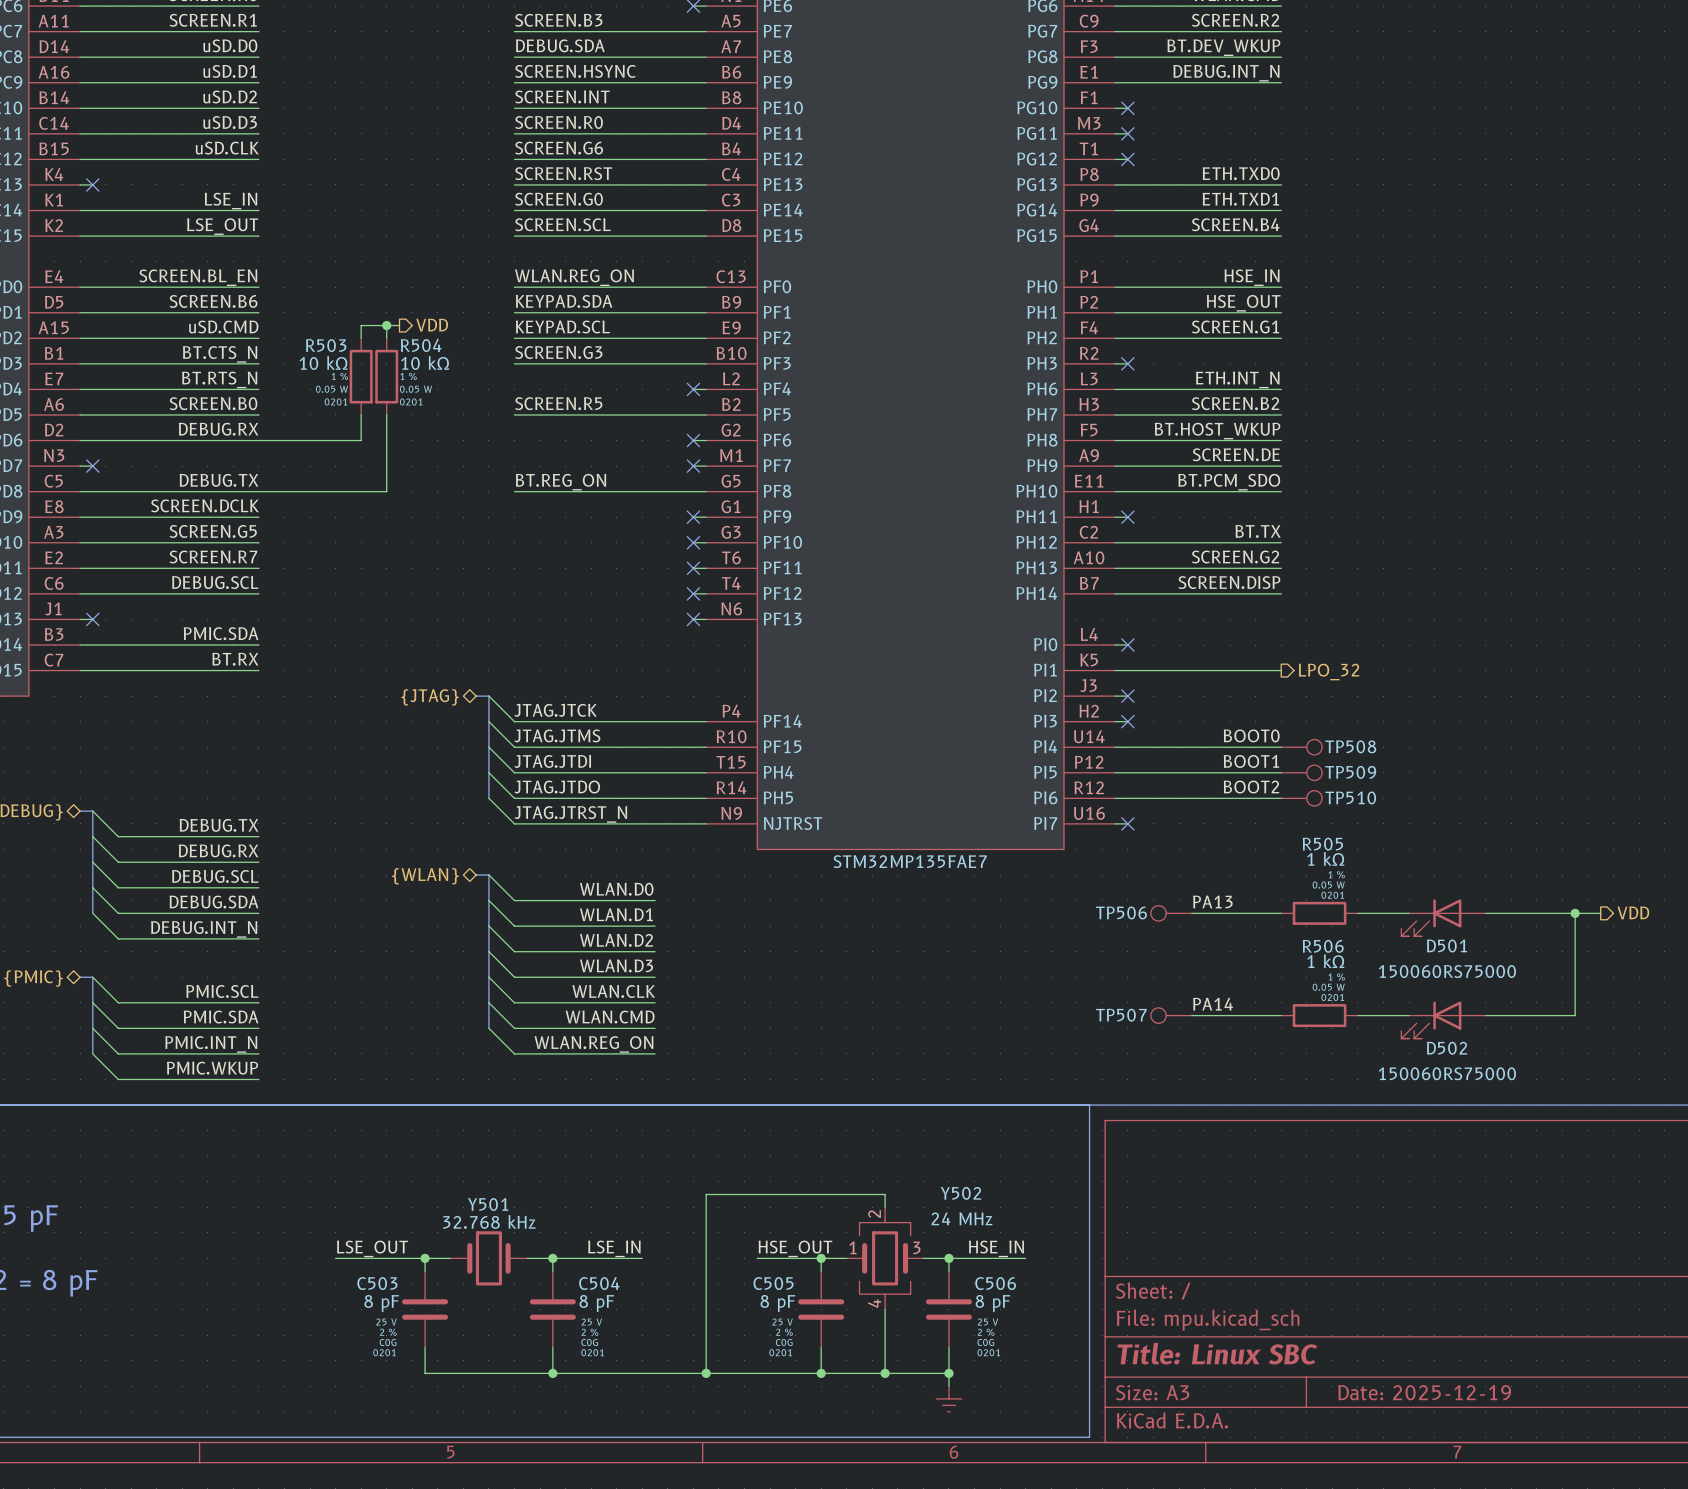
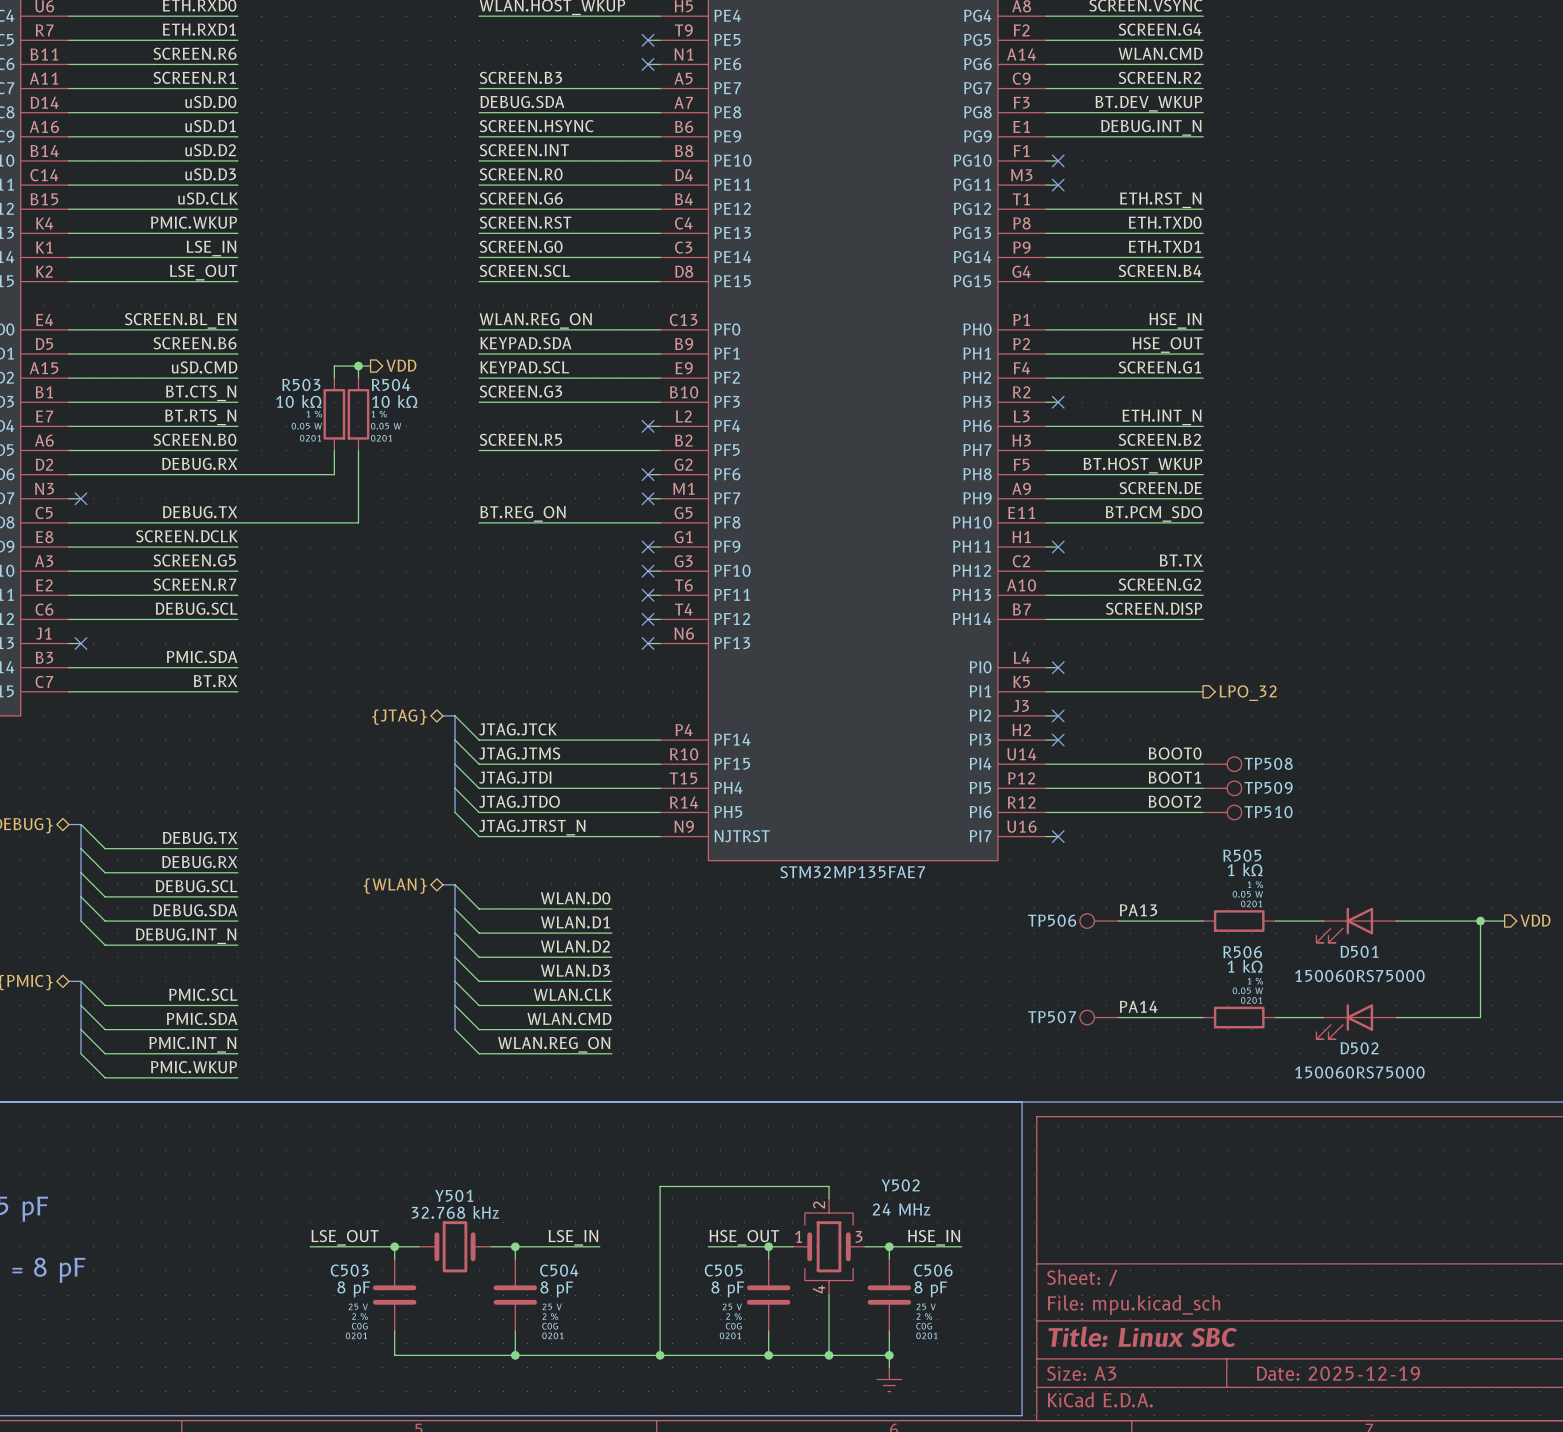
label: none -> ETH.RST_N (1160, 200)
wire: none -> (1058, 209) (1203, 209)
no-connect mark: (1127, 159) -> none
label: none -> PMIC.WKUP (193, 222)
wire: none -> (80, 233) (237, 233)
no-connect mark: (92, 184) -> none

